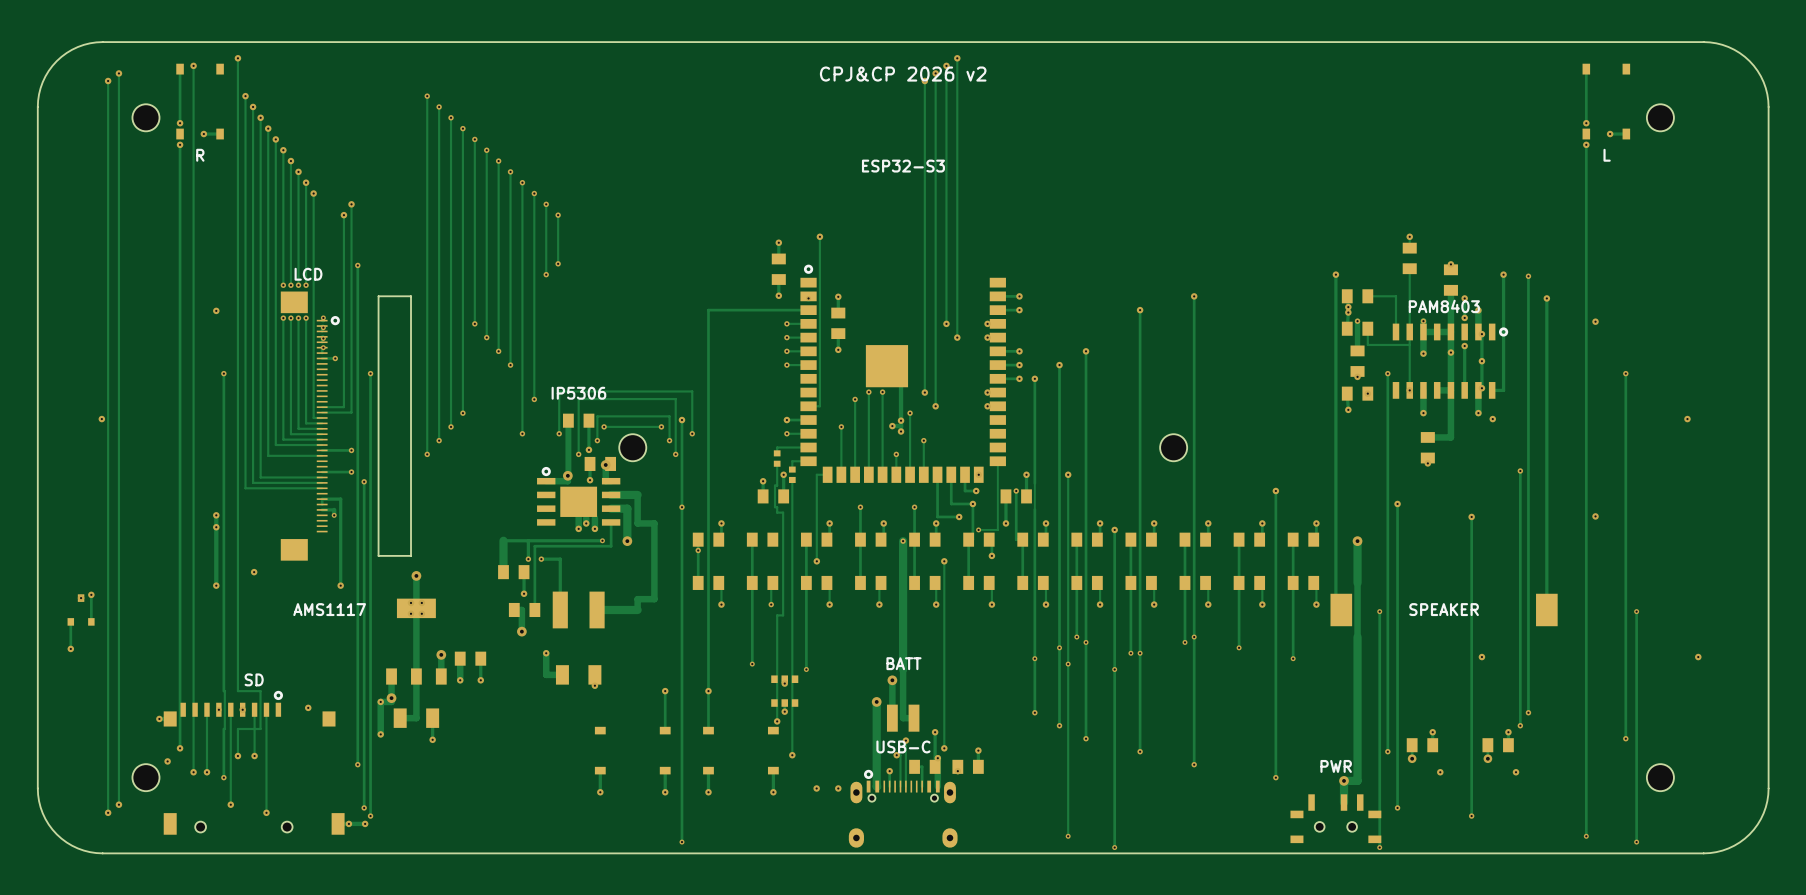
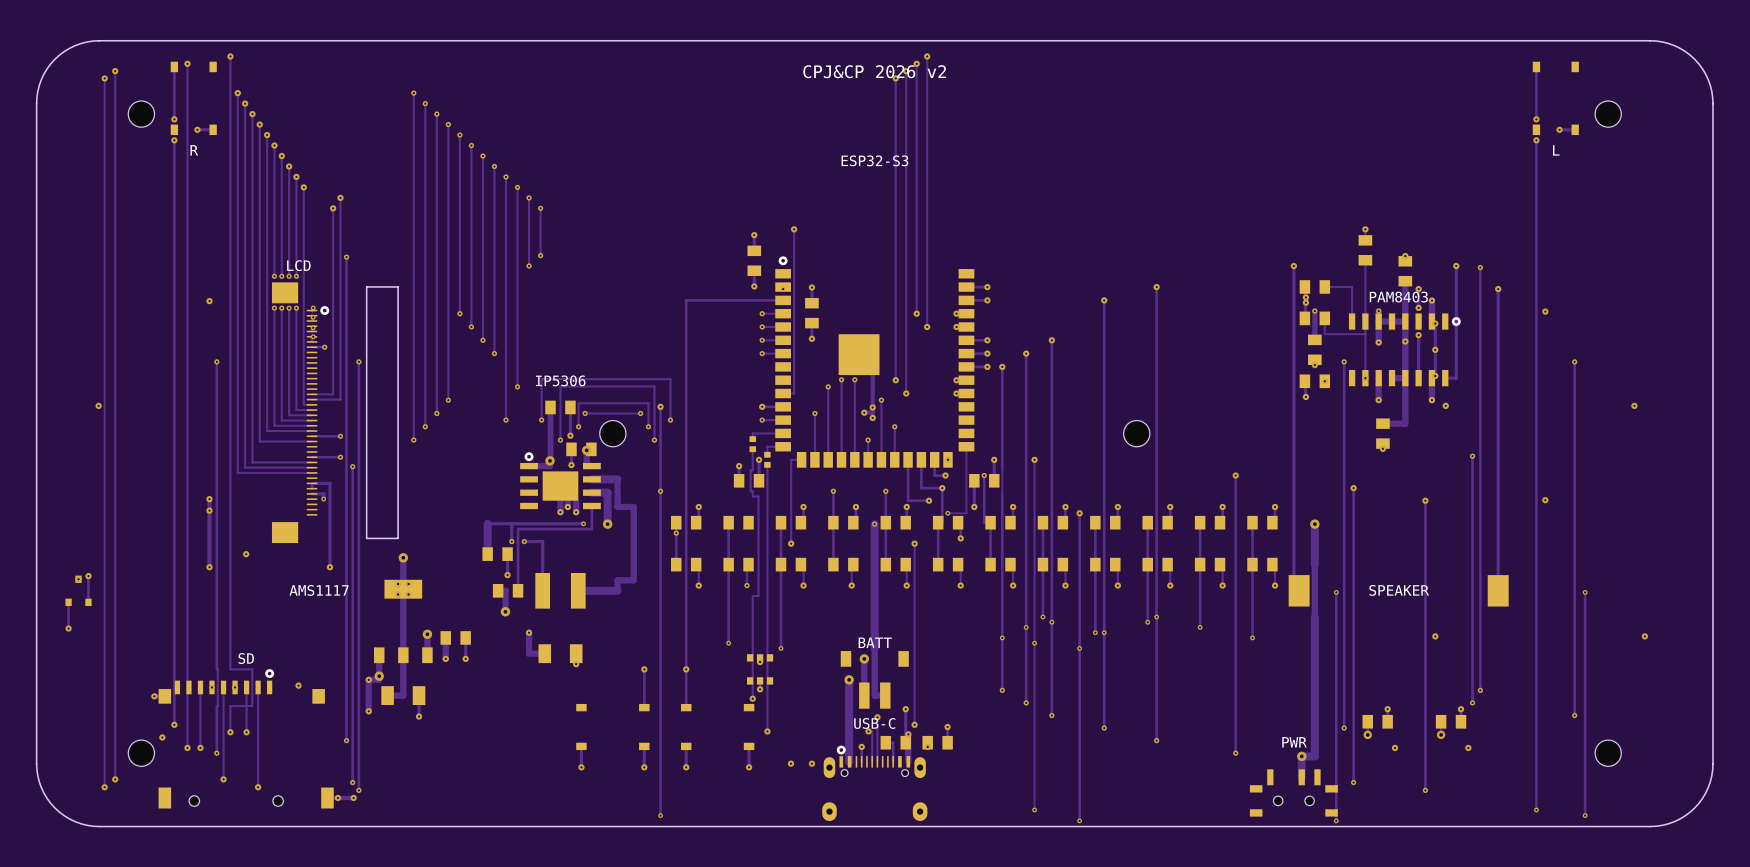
part: none -> (874, 679)

